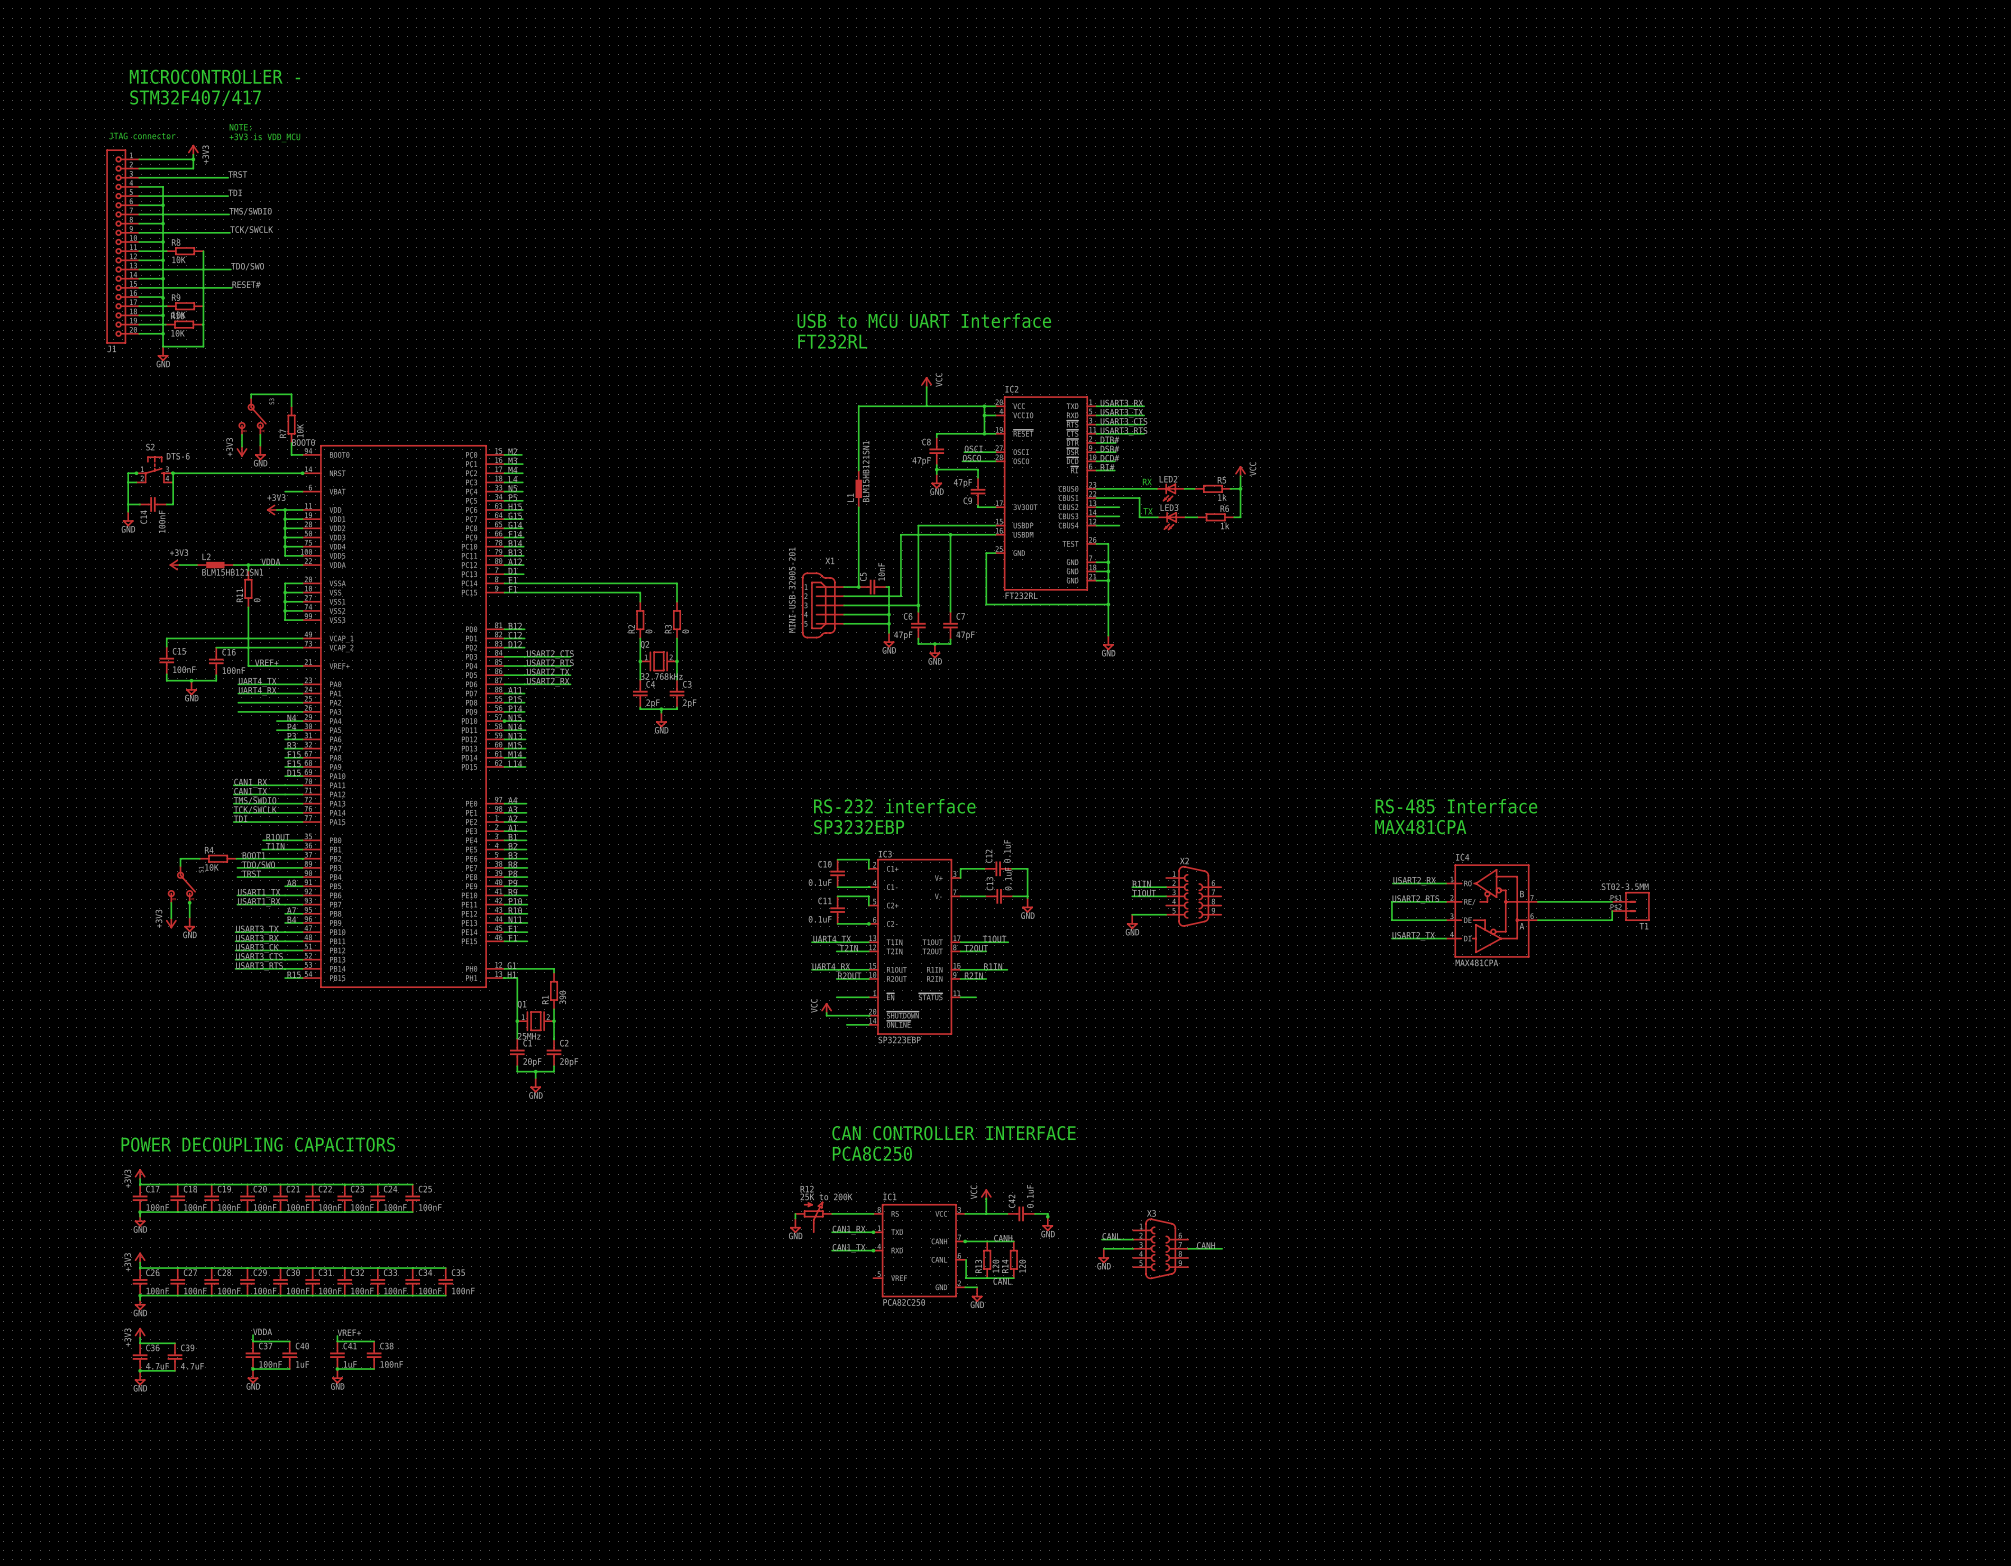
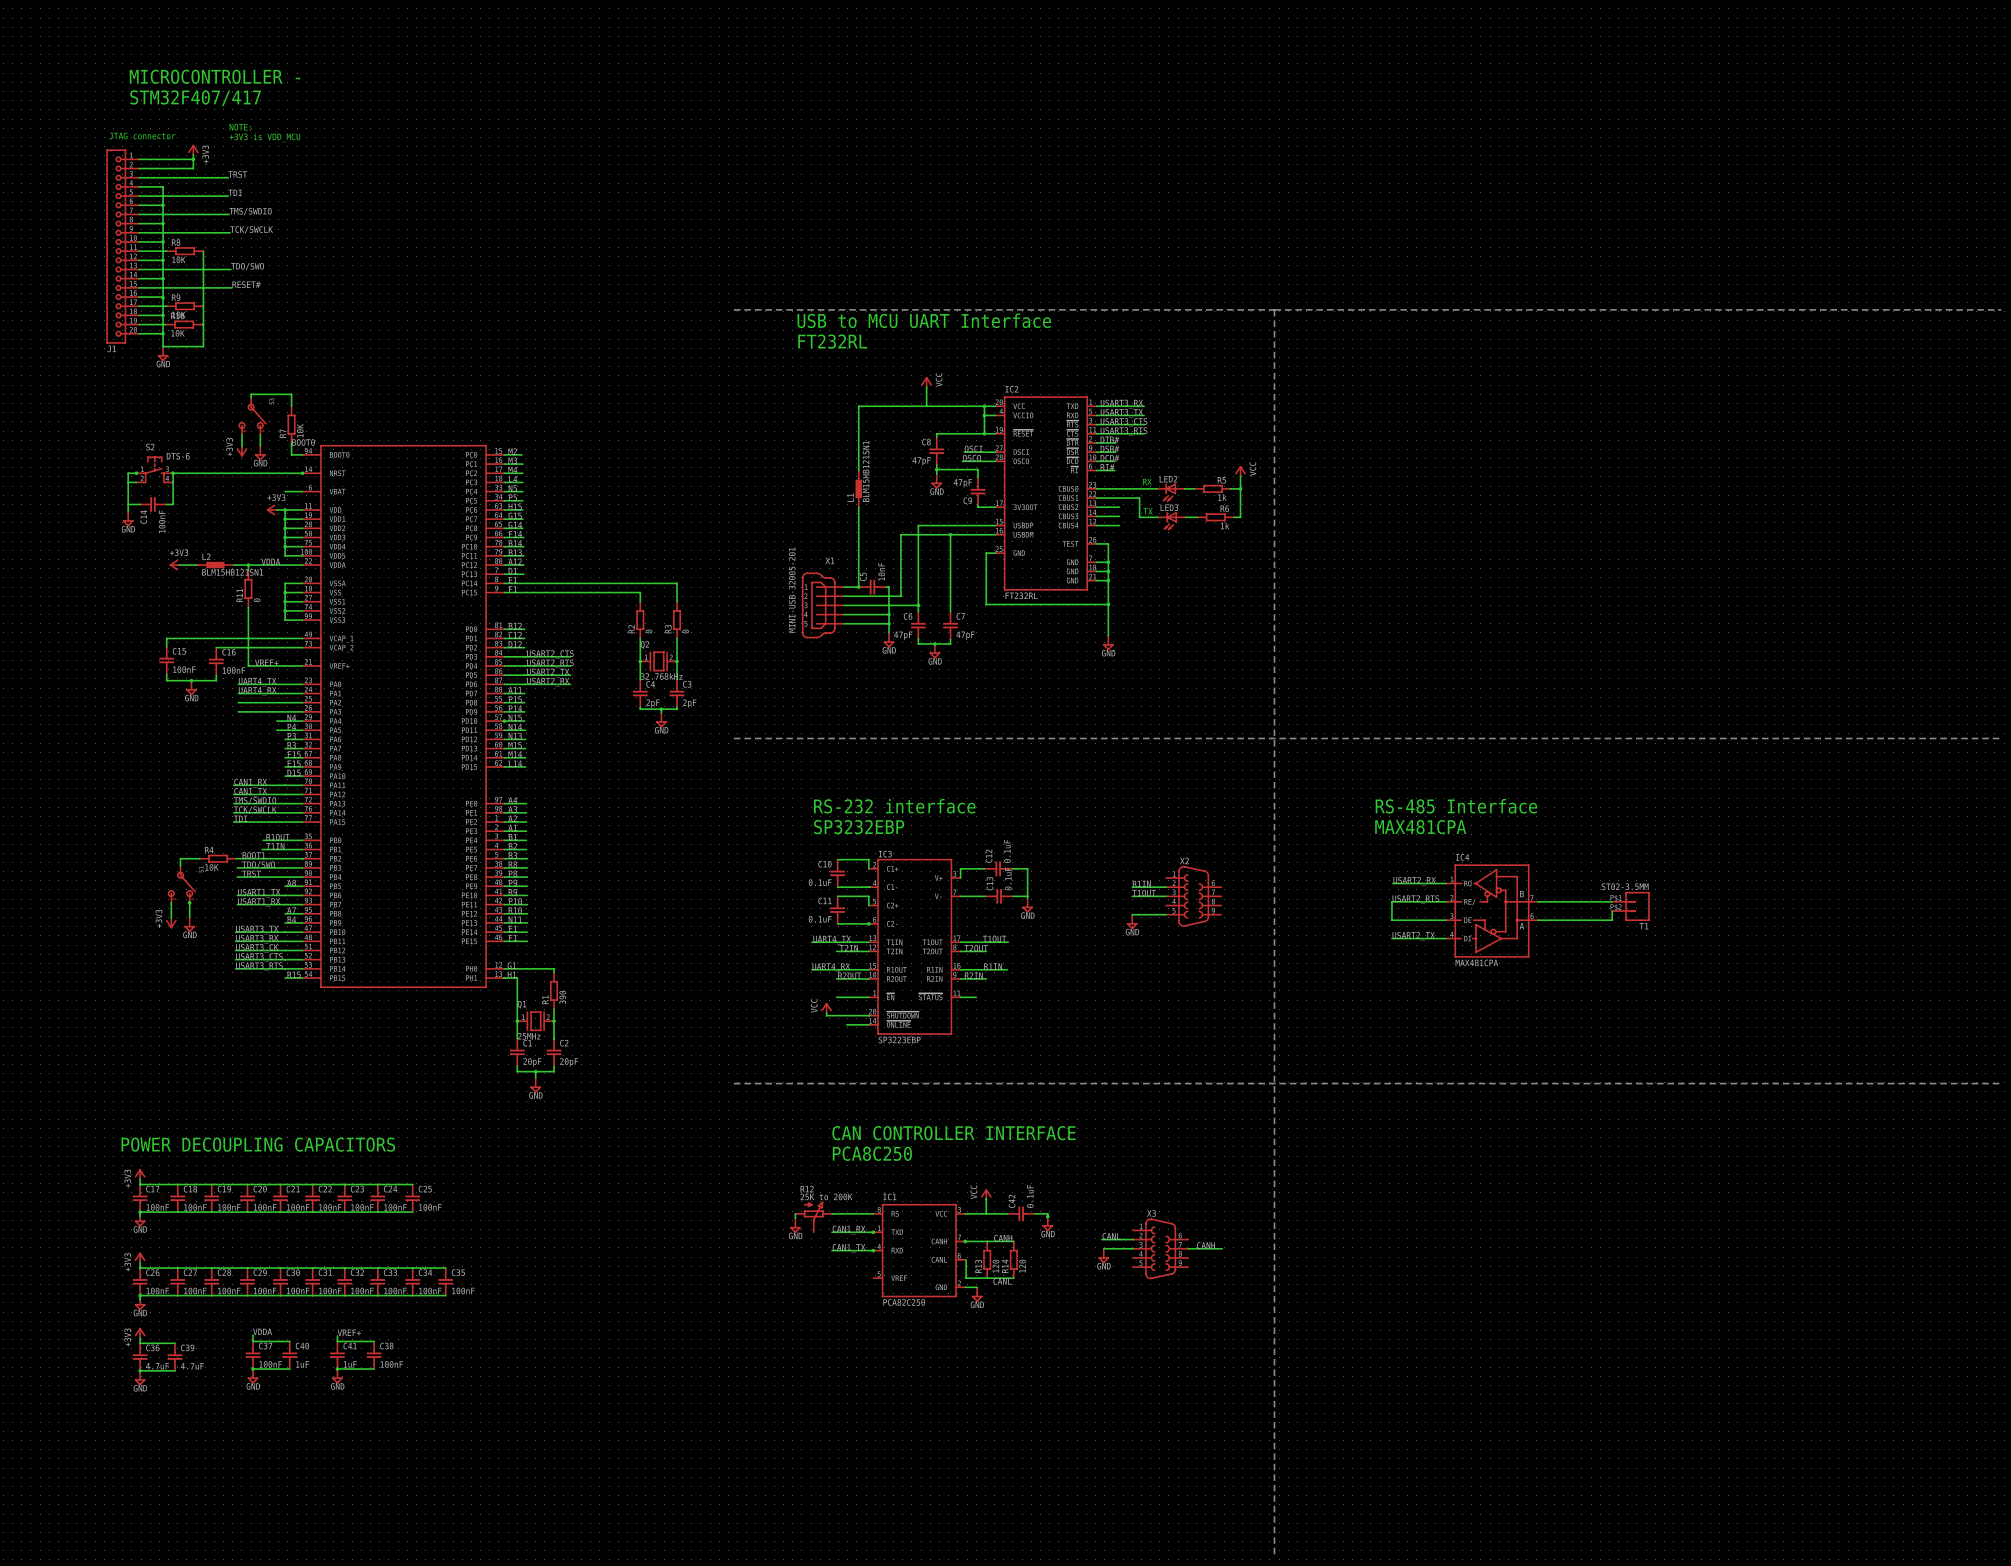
bus: none -> (733, 309) (2001, 309)
bus: none -> (1274, 309) (1274, 1556)
bus: none -> (733, 738) (2001, 738)
bus: none -> (733, 1083) (2001, 1083)

